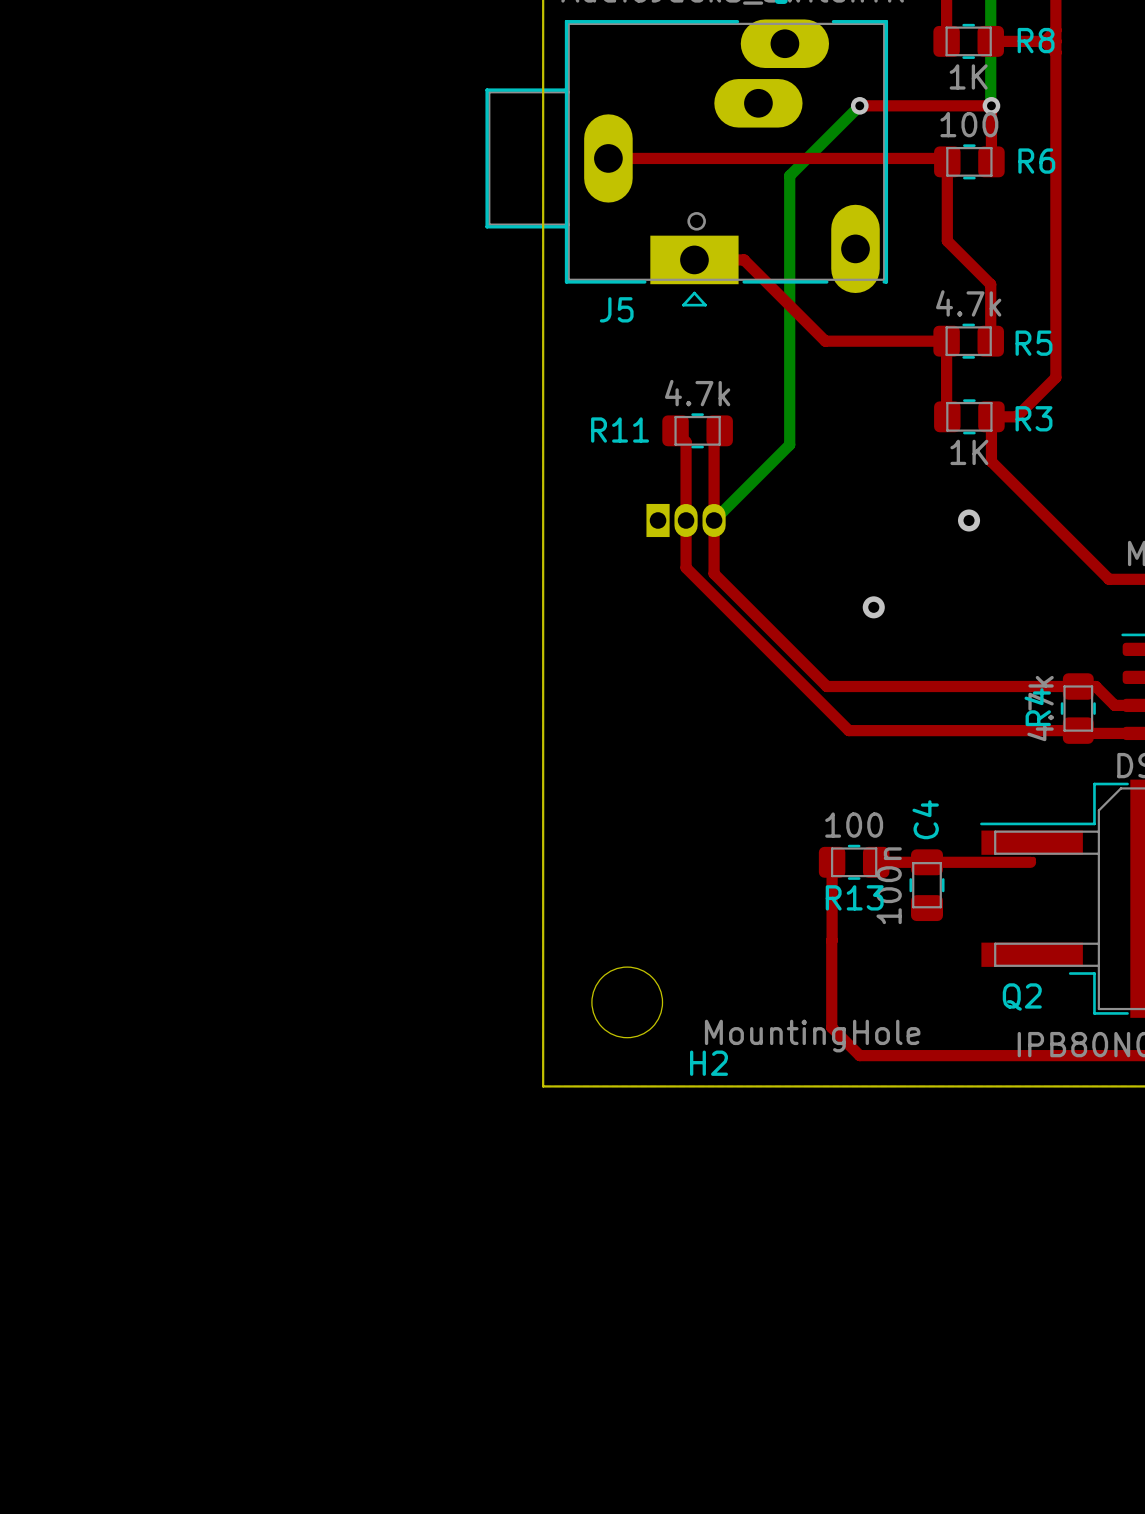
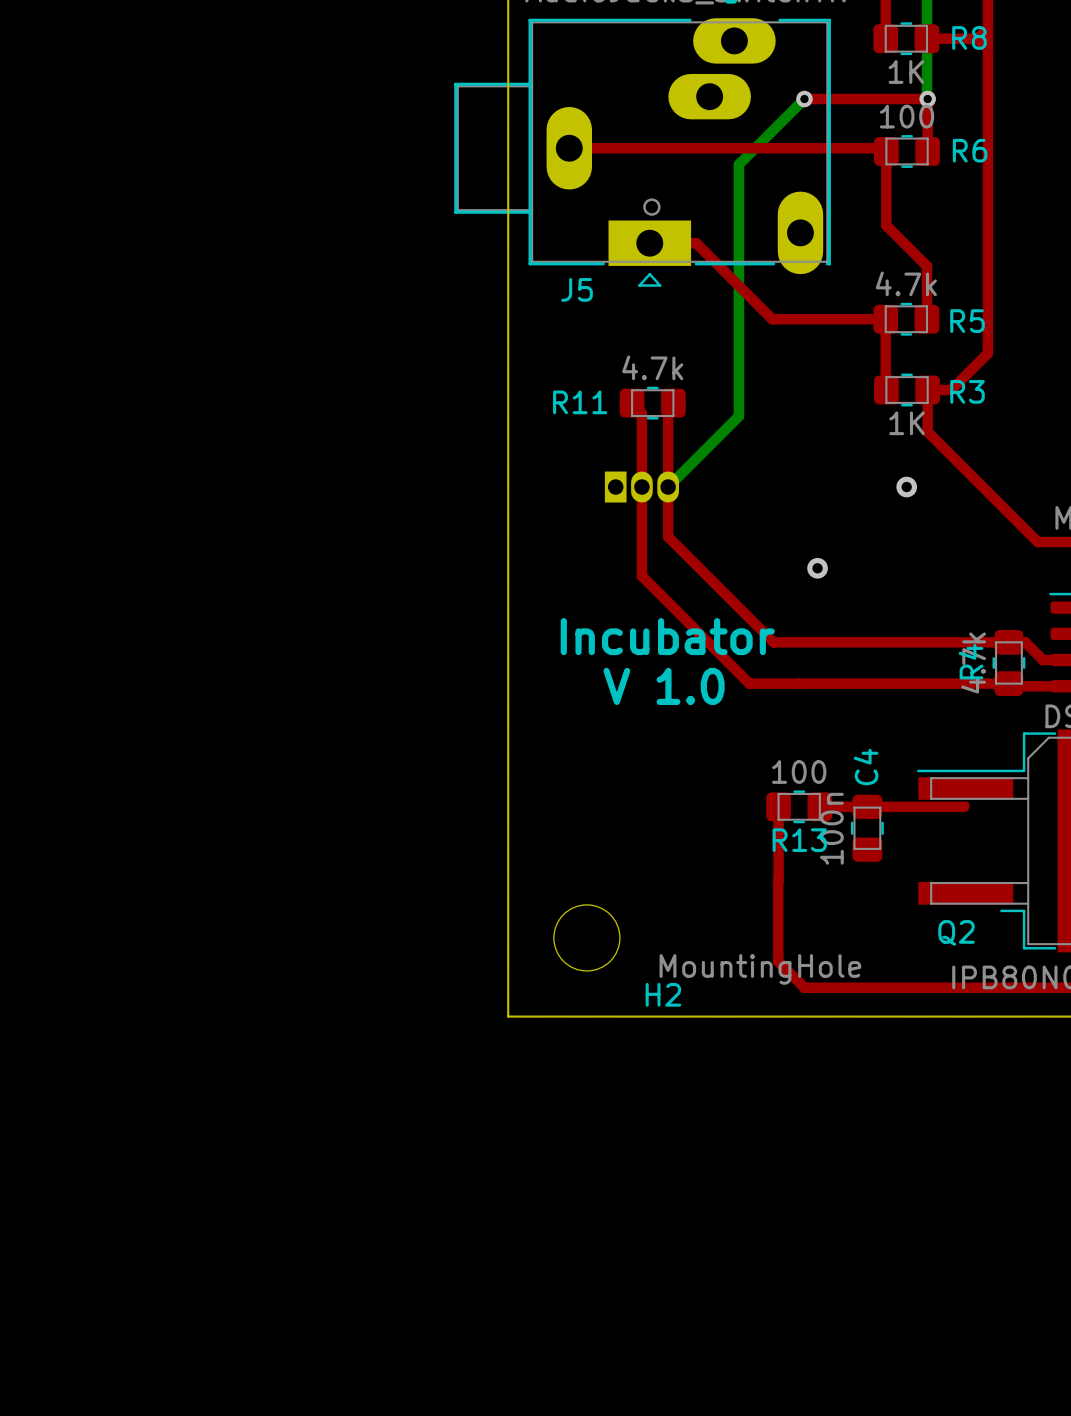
top track: (686, 567) (848, 730) -> (641, 531) (641, 576) (749, 683) (794, 683)
text: none -> Incubator (667, 636)
text: none -> V 1.0 (664, 686)

